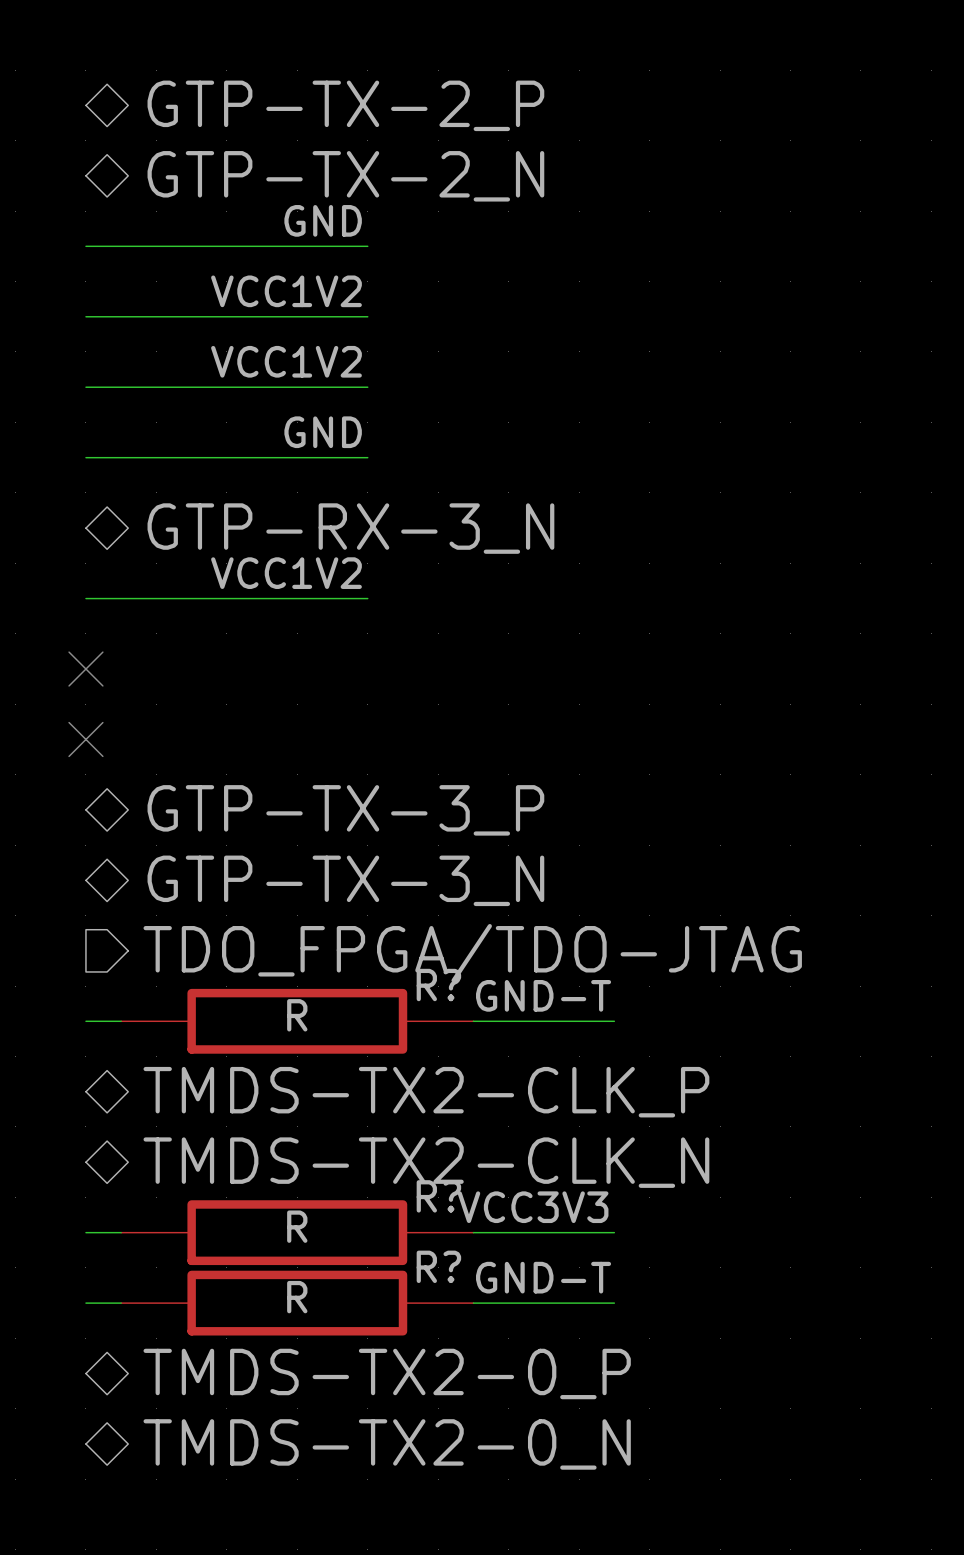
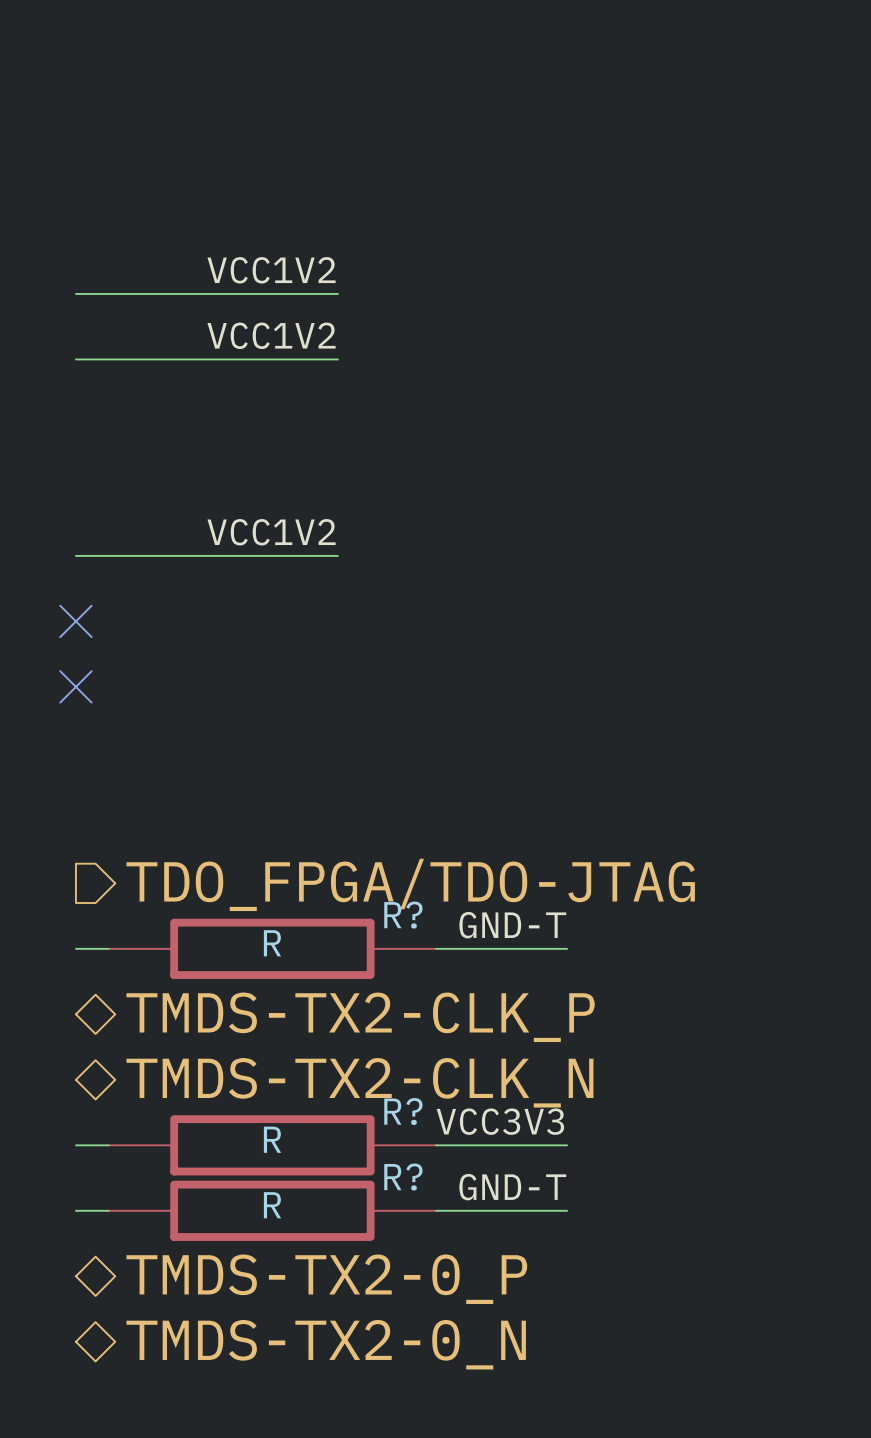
hierarchical label: GTP-TX-2_P (345, 105) -> none
hierarchical label: GTP-TX-2_N (345, 176) -> none
label: GND (323, 220) -> none
wire: (85, 246) (367, 246) -> none
label: GND (323, 432) -> none
wire: (85, 457) (367, 457) -> none
hierarchical label: GTP-RX-3_N (350, 528) -> none
hierarchical label: GTP-TX-3_P (345, 810) -> none
hierarchical label: GTP-TX-3_N (345, 880) -> none

